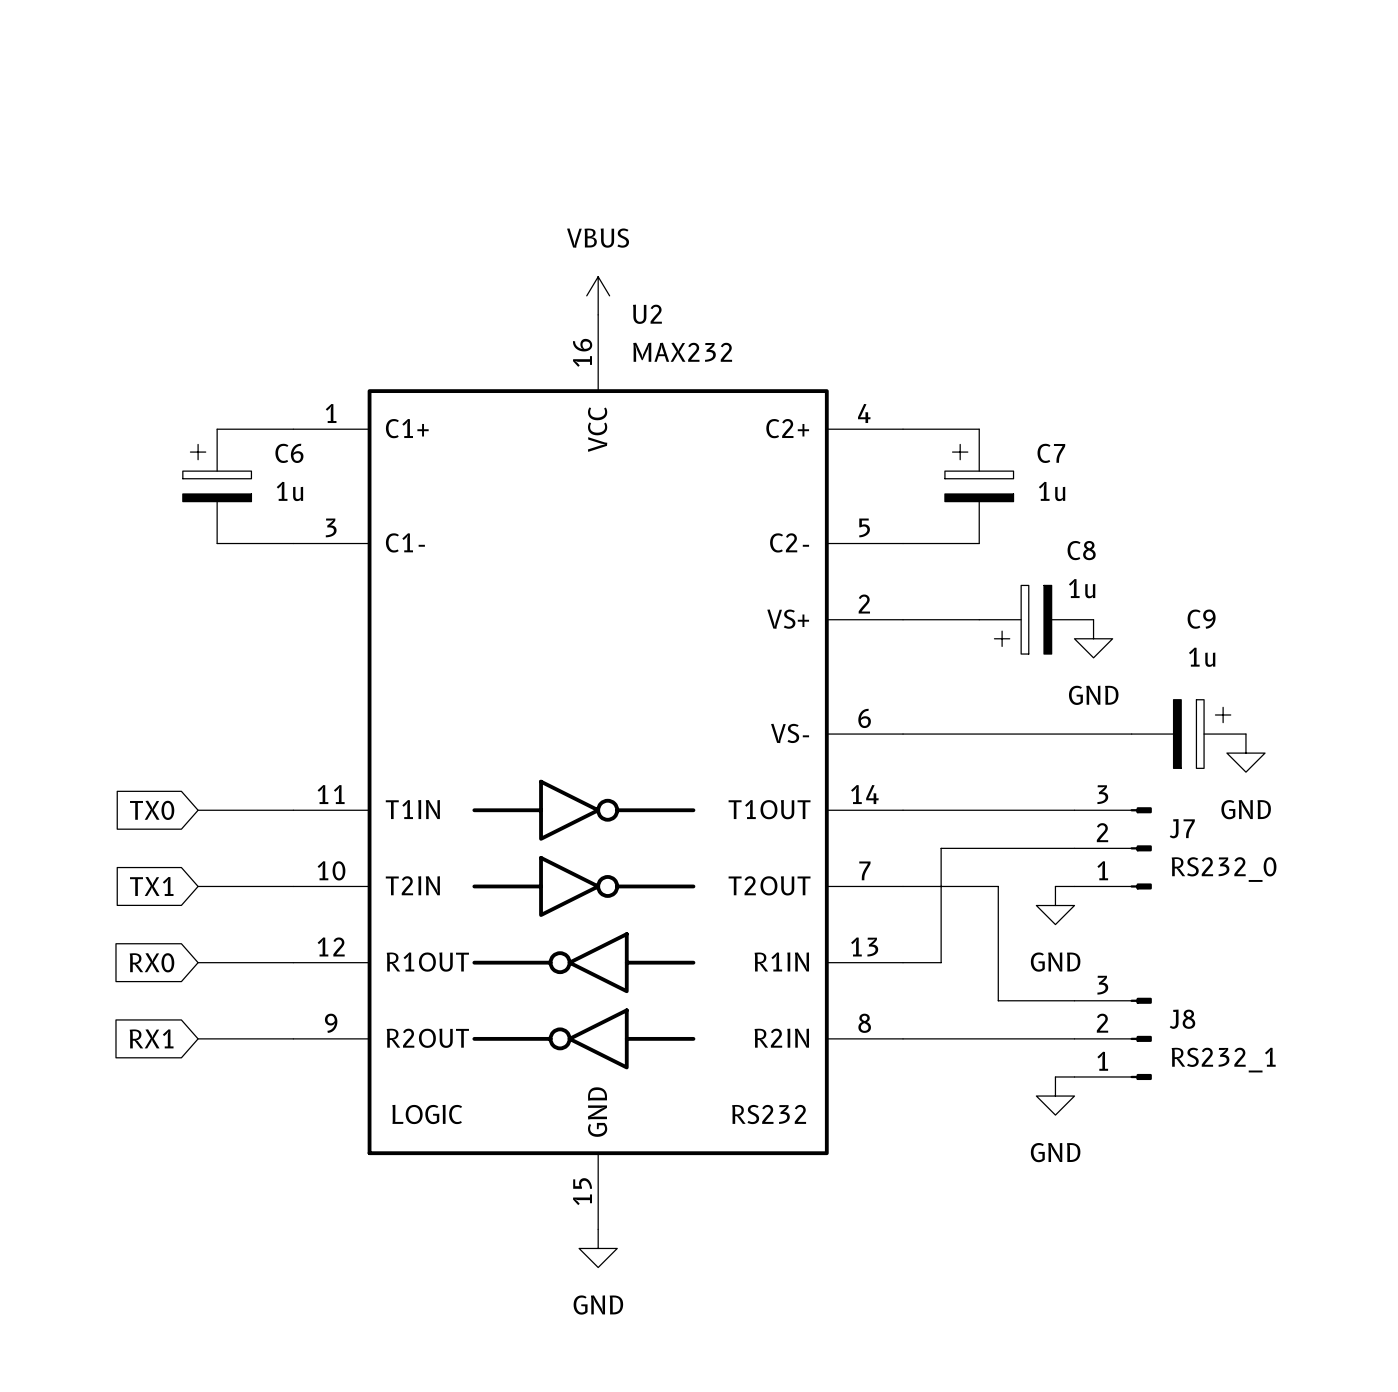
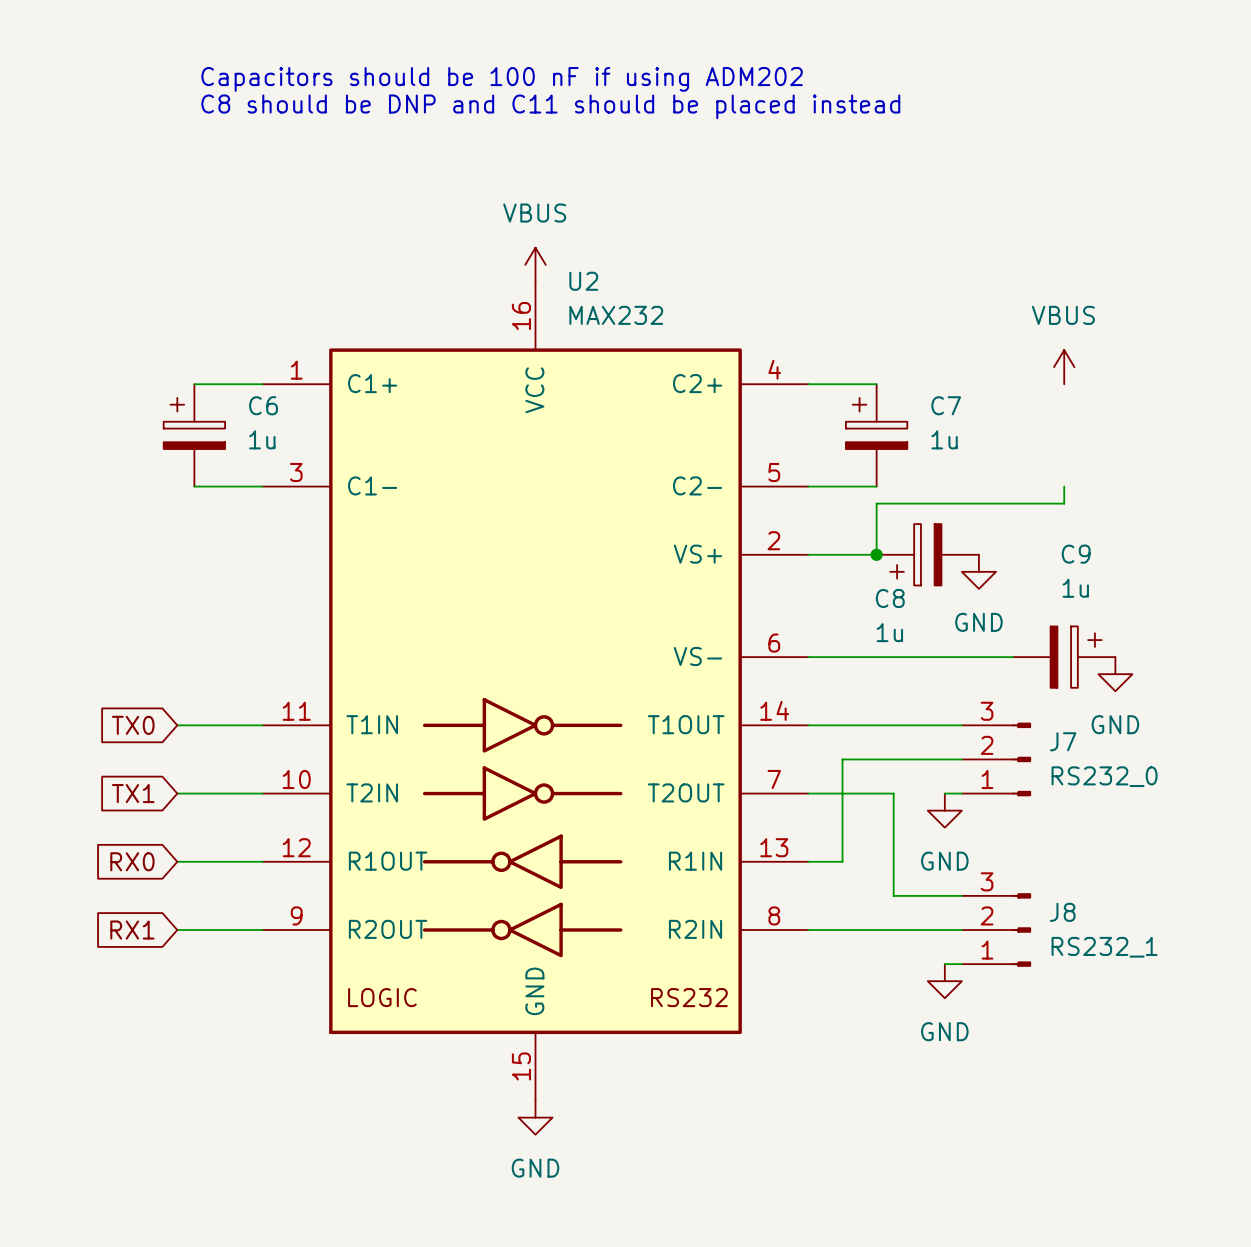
text: none -> Capacitors should be 100 nF if using ADM202 (502, 79)
text: none -> C8 should be DNP and C11 should be placed instead (550, 106)
power symbol: none -> VBUS (1064, 367)
wire: none -> (1064, 486) (1064, 503) (876, 503) (876, 554)
C8 name position: C8 (1081, 550) -> C8 (890, 598)
C8 value position: 1u (1082, 588) -> 1u (889, 632)
junction: none -> (876, 554)

